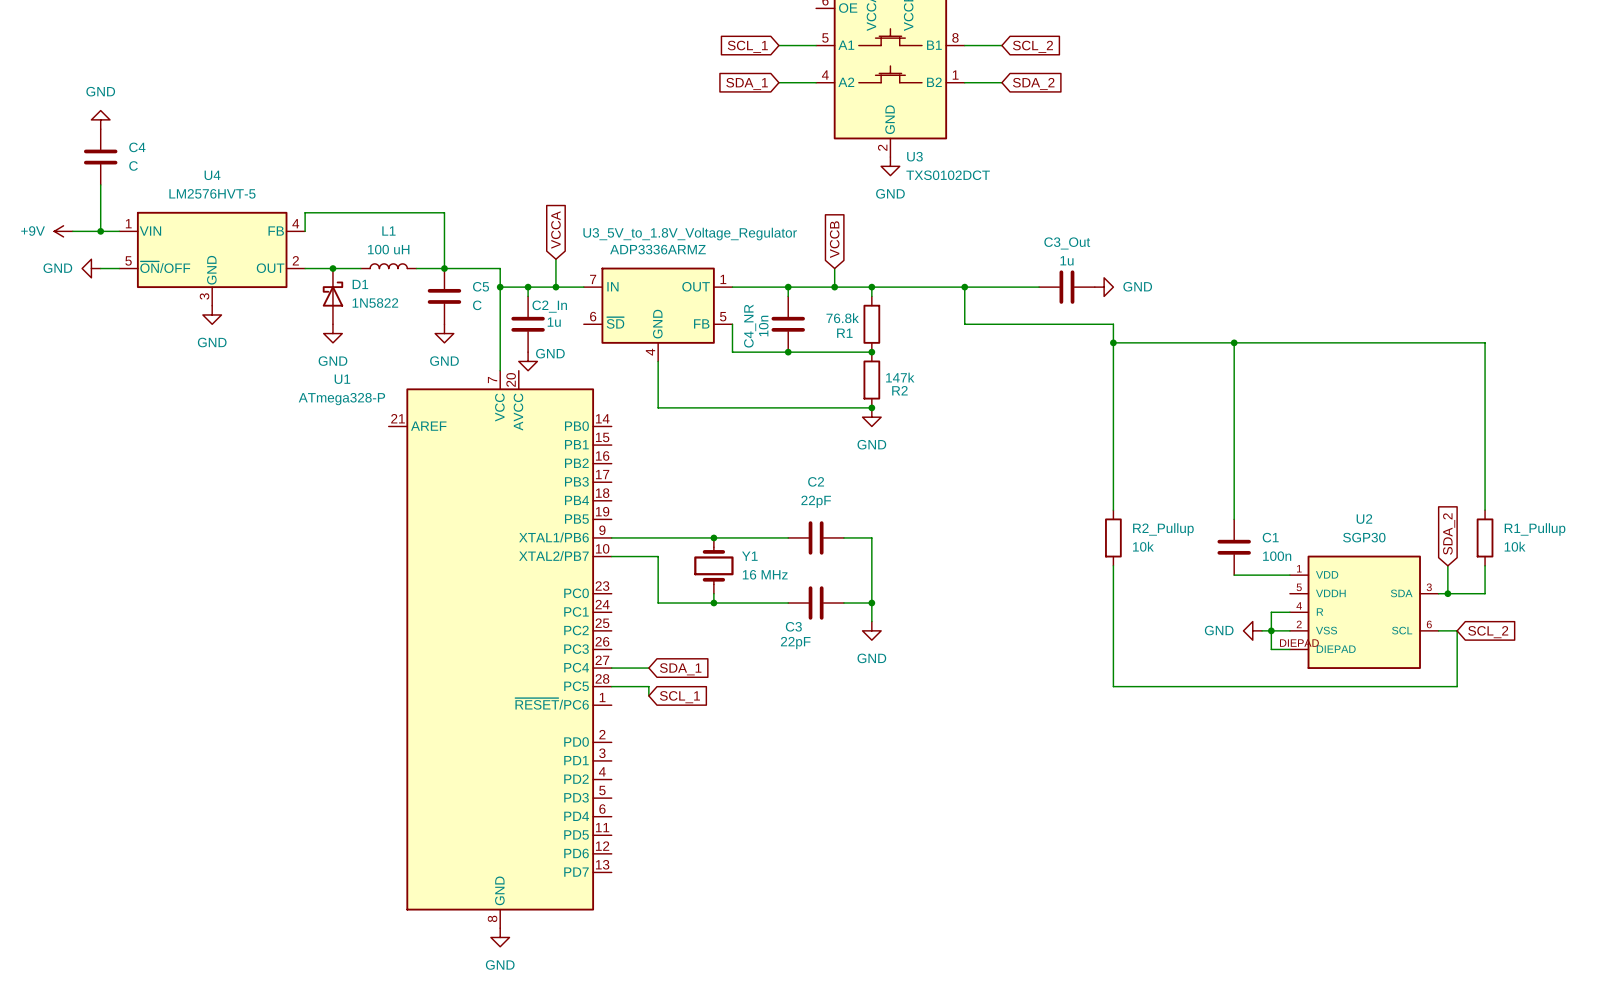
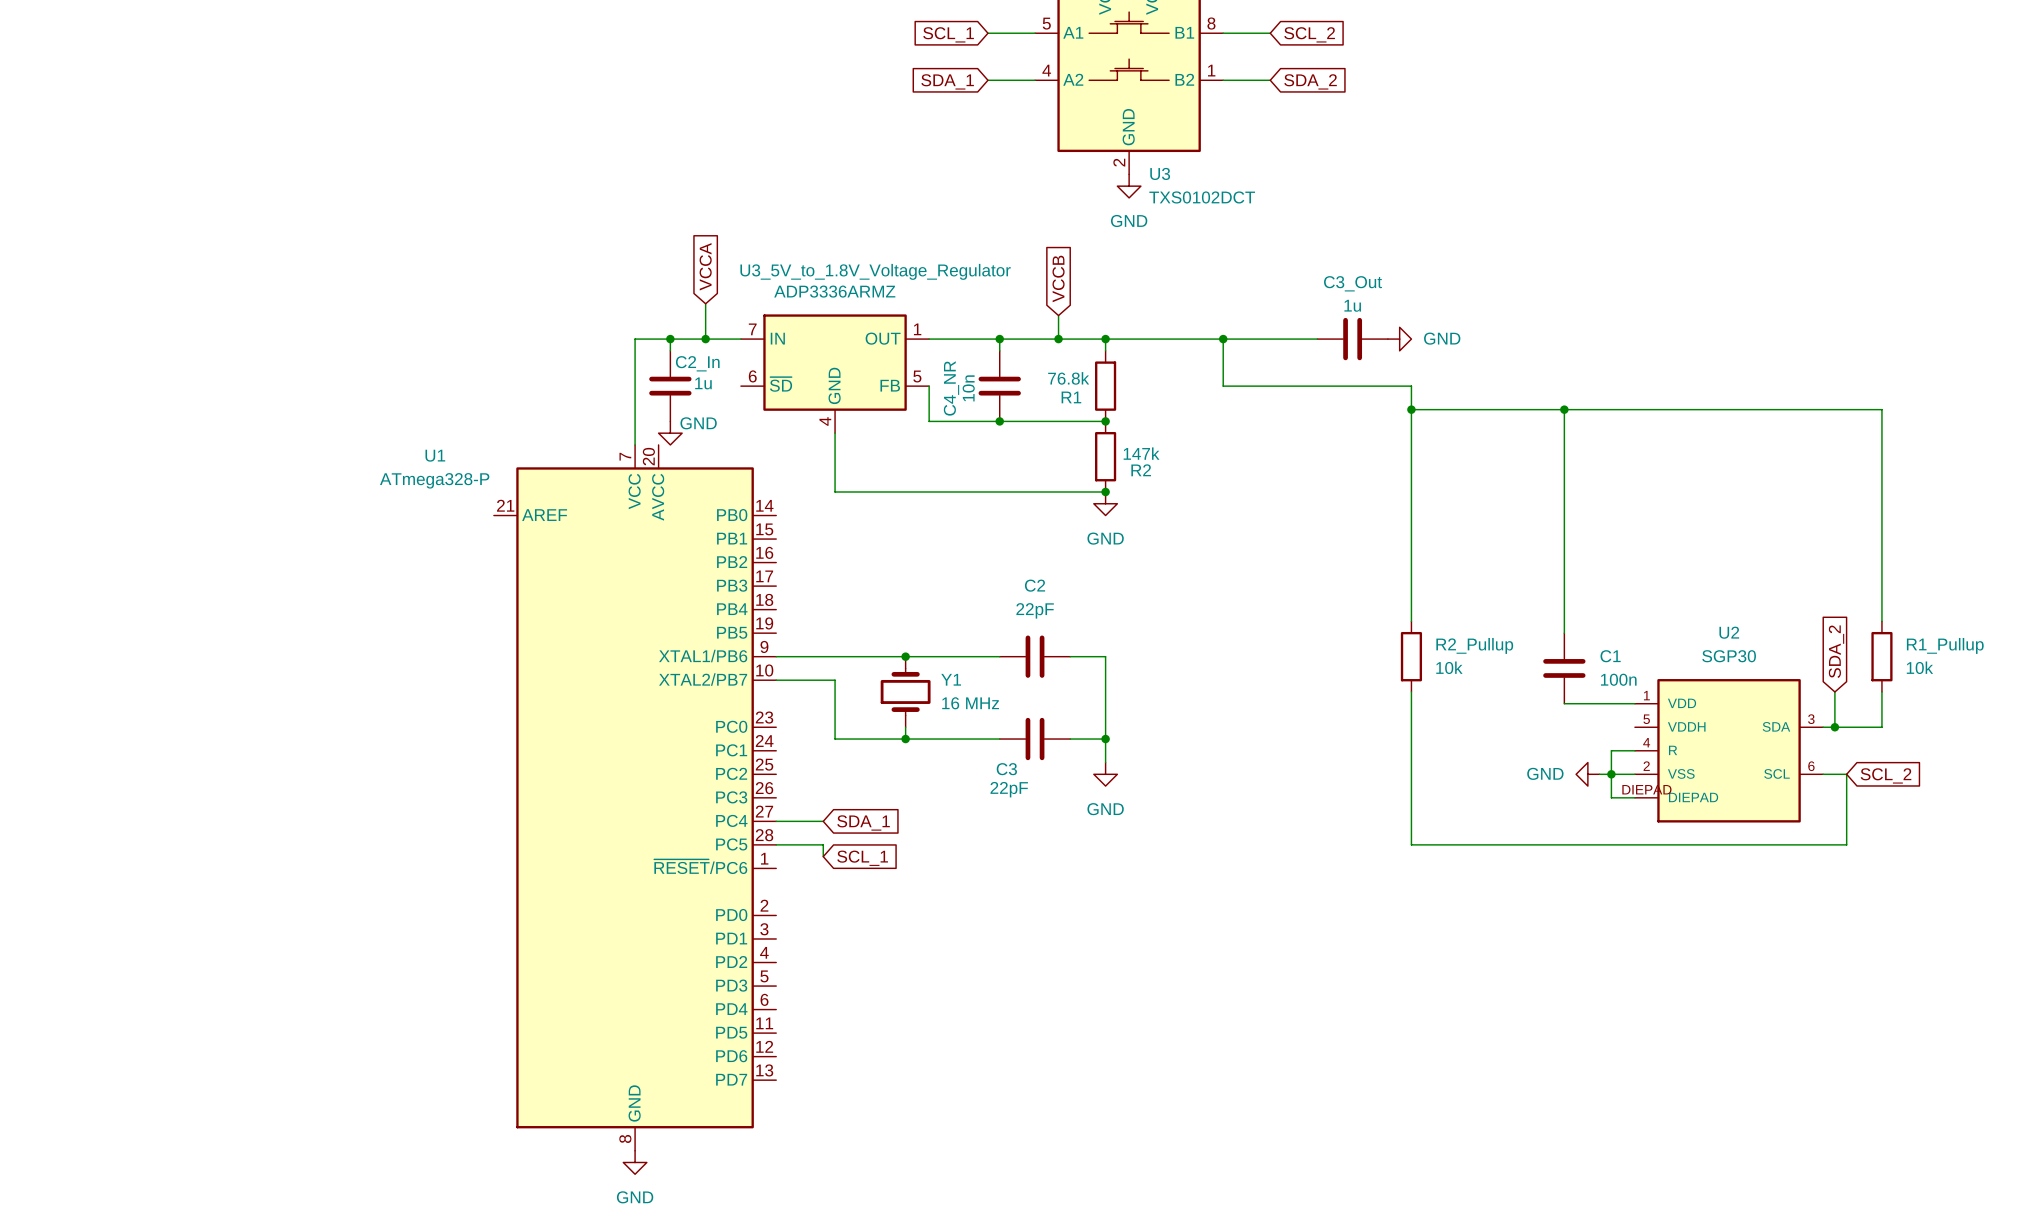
power symbol: GND (100, 119) -> none
C4: C (100, 157) -> none
wire: (100, 184) (100, 231) -> none
power symbol: +9V (63, 231) -> none
wire: (72, 231) (119, 231) -> none
junction: (100, 231) -> none
wire: (305, 231) (305, 212) (444, 212) (444, 268) -> none
U4: LM2576HVT-5 (212, 258) -> none
L1: 100 uH (388, 266) -> none
power symbol: GND (91, 268) -> none
wire: (100, 268) (119, 268) -> none
wire: (305, 268) (360, 268) -> none
junction: (332, 268) -> none
wire: (416, 268) (500, 268) (500, 287) -> none
junction: (444, 268) -> none
junction: (500, 287) -> none
D1: 1N5822 (332, 296) -> none
C5: C (444, 296) -> none
power symbol: GND (212, 314) -> none
power symbol: GND (332, 333) -> none
power symbol: GND (444, 333) -> none

